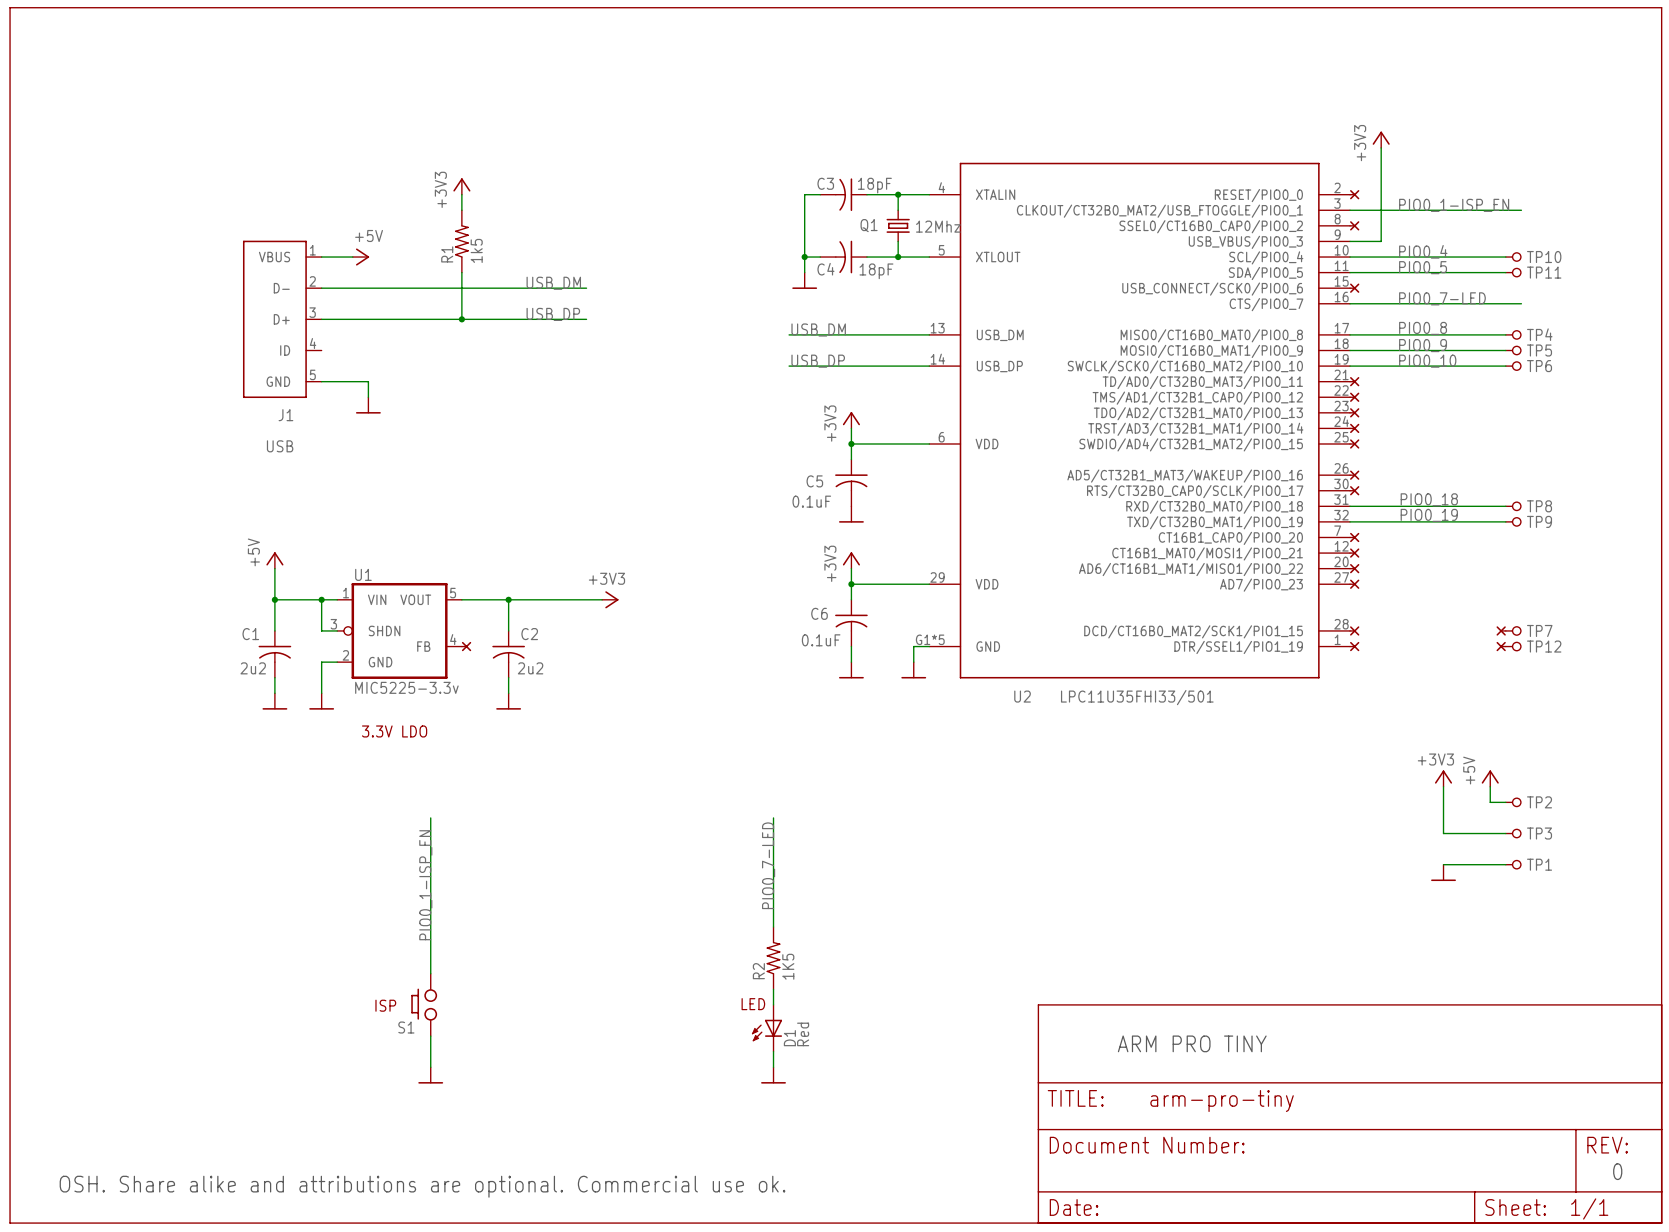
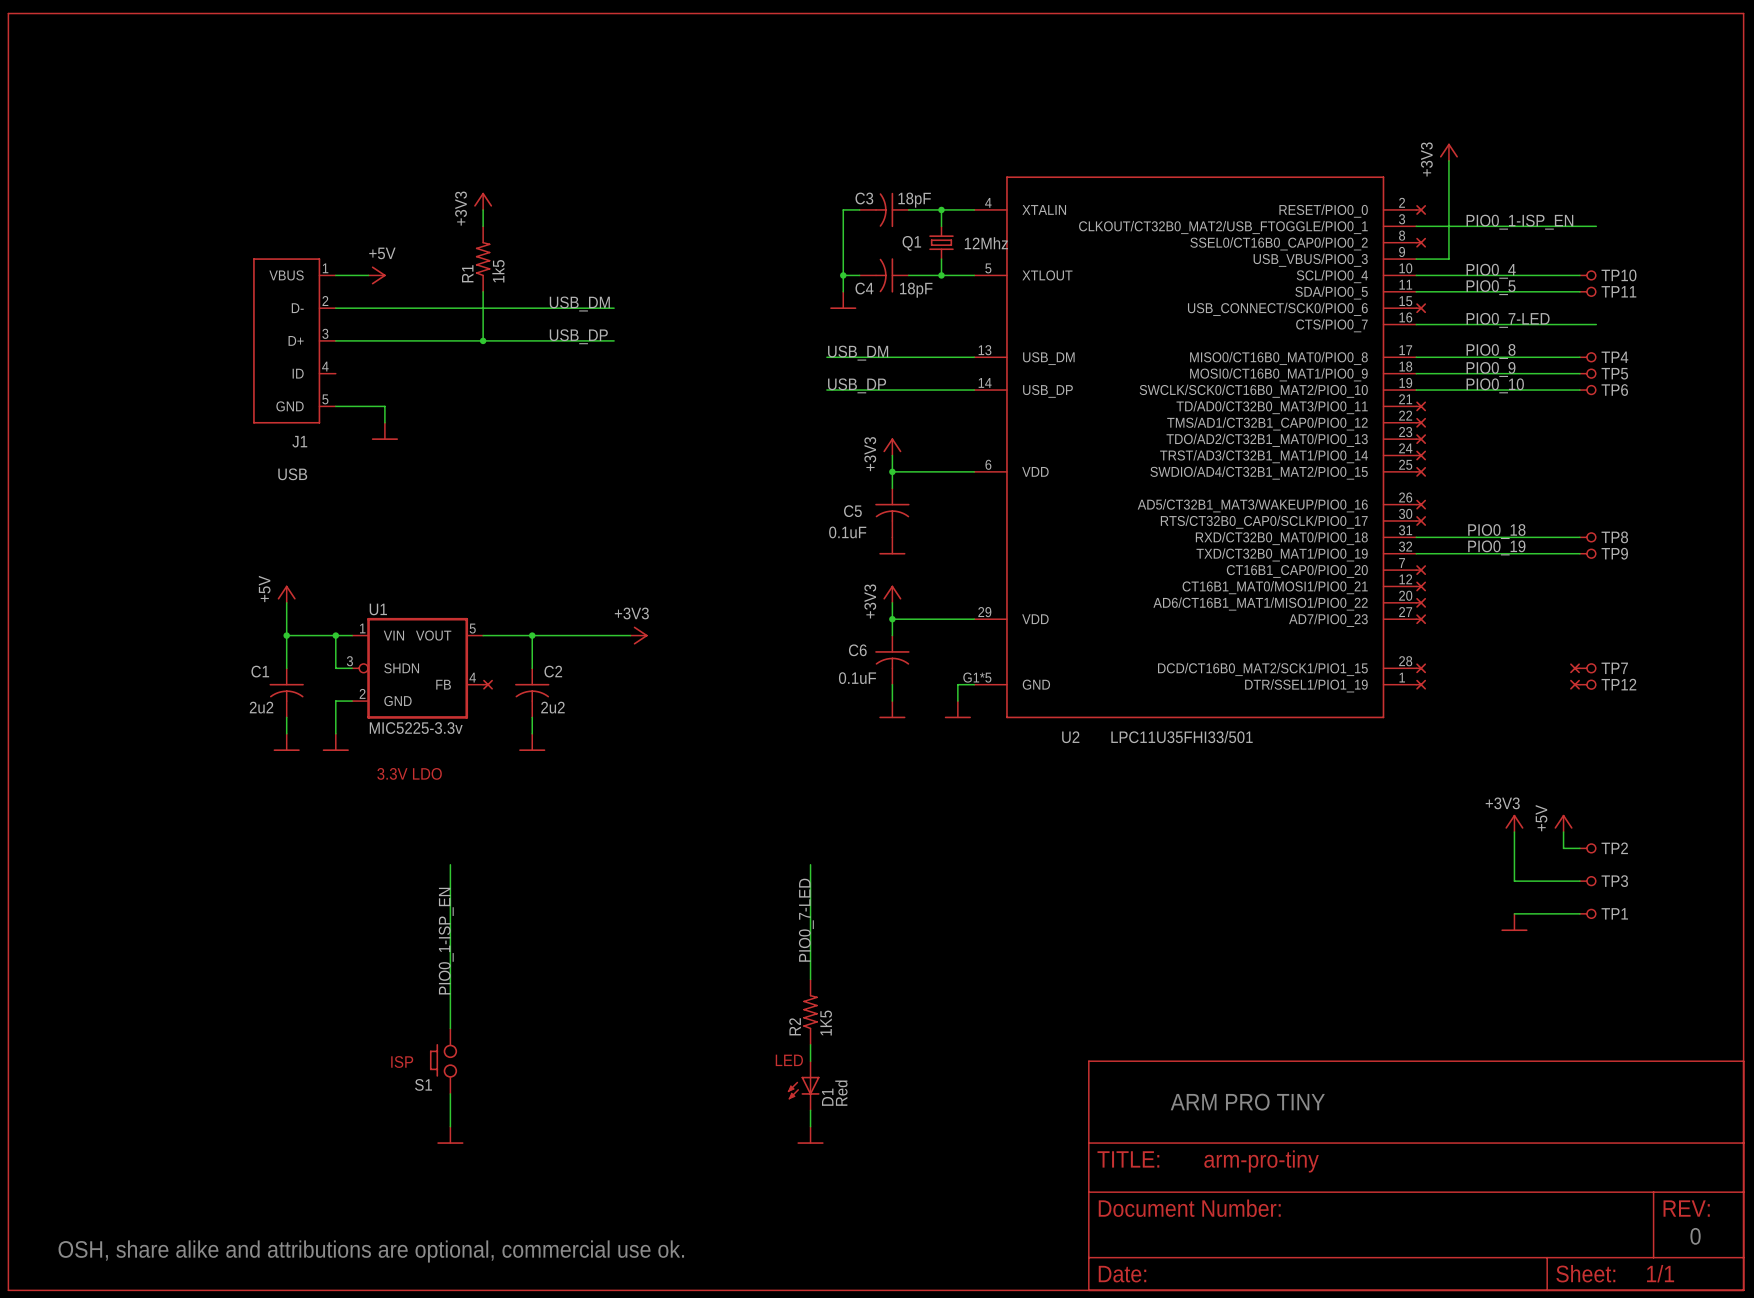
text: OSH. Share alike and attributions are optional. Commercial use ok. (422, 1186) -> OSH, share alike and attributions are optional, commercial use ok. (371, 1251)

